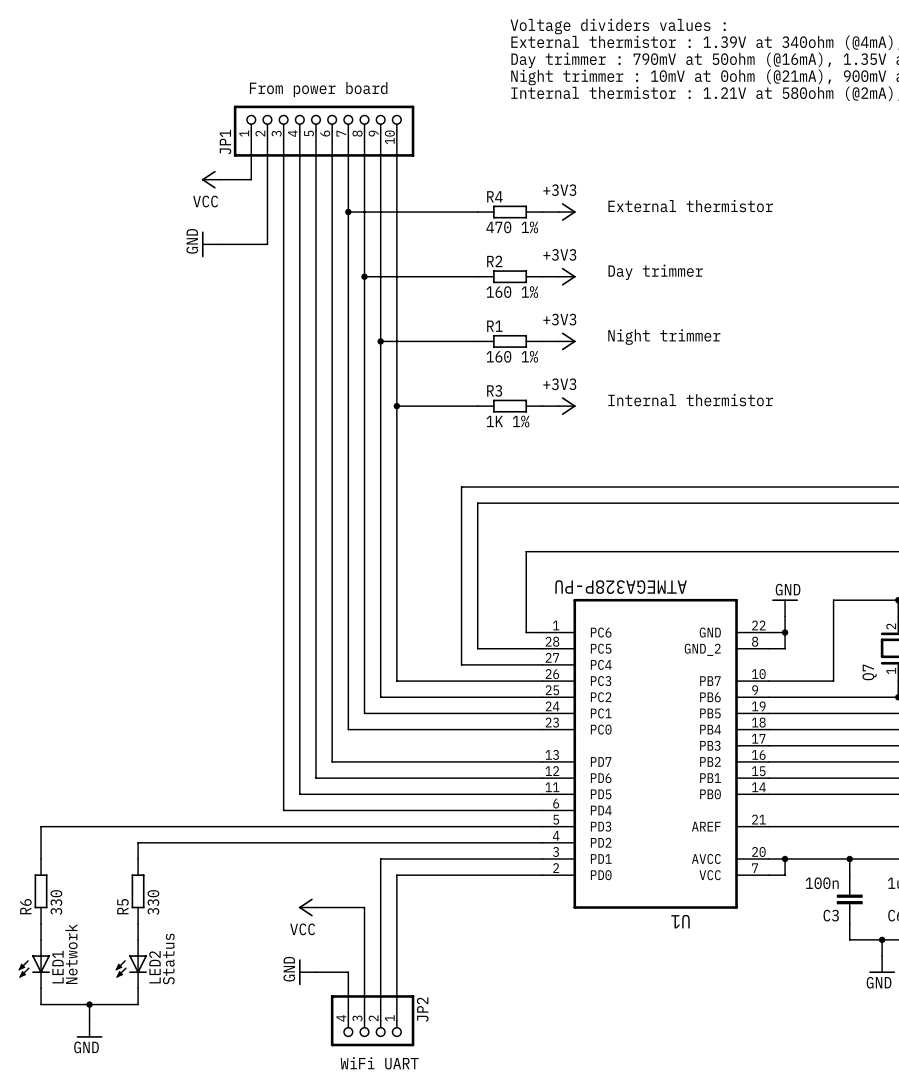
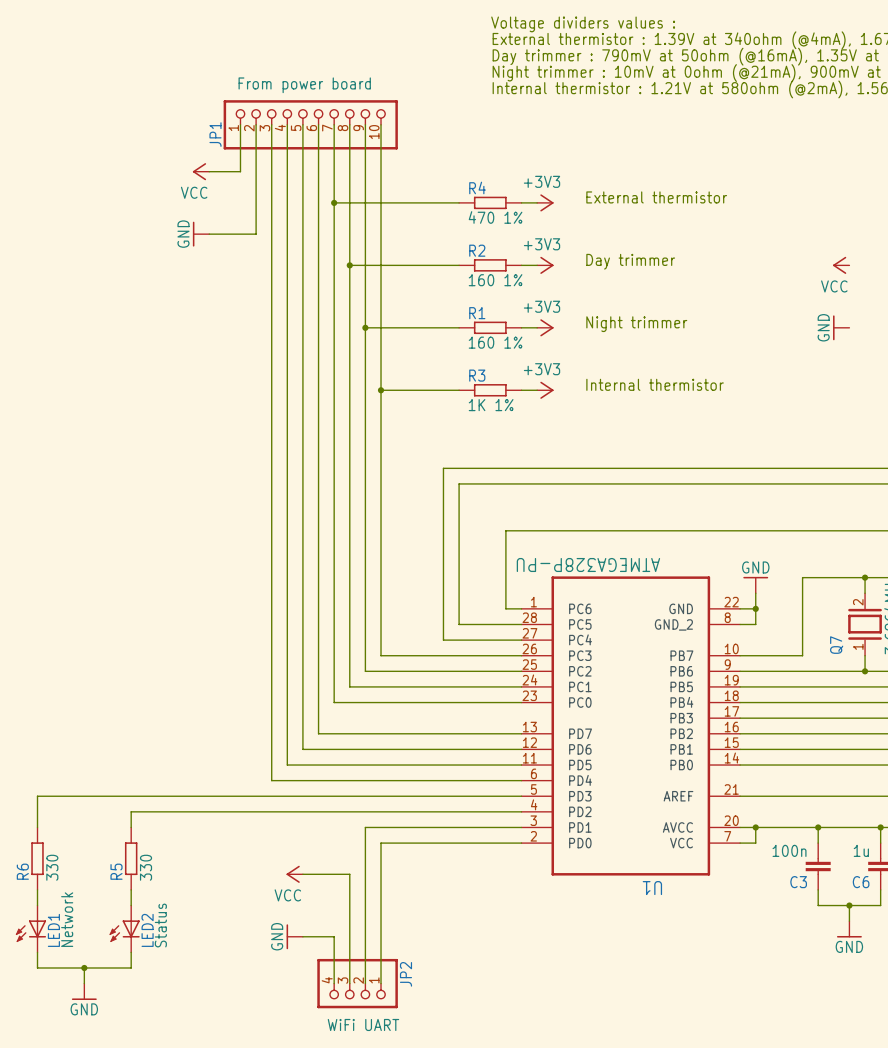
power symbol: none -> VCC (841, 265)
power symbol: none -> GND (841, 327)

